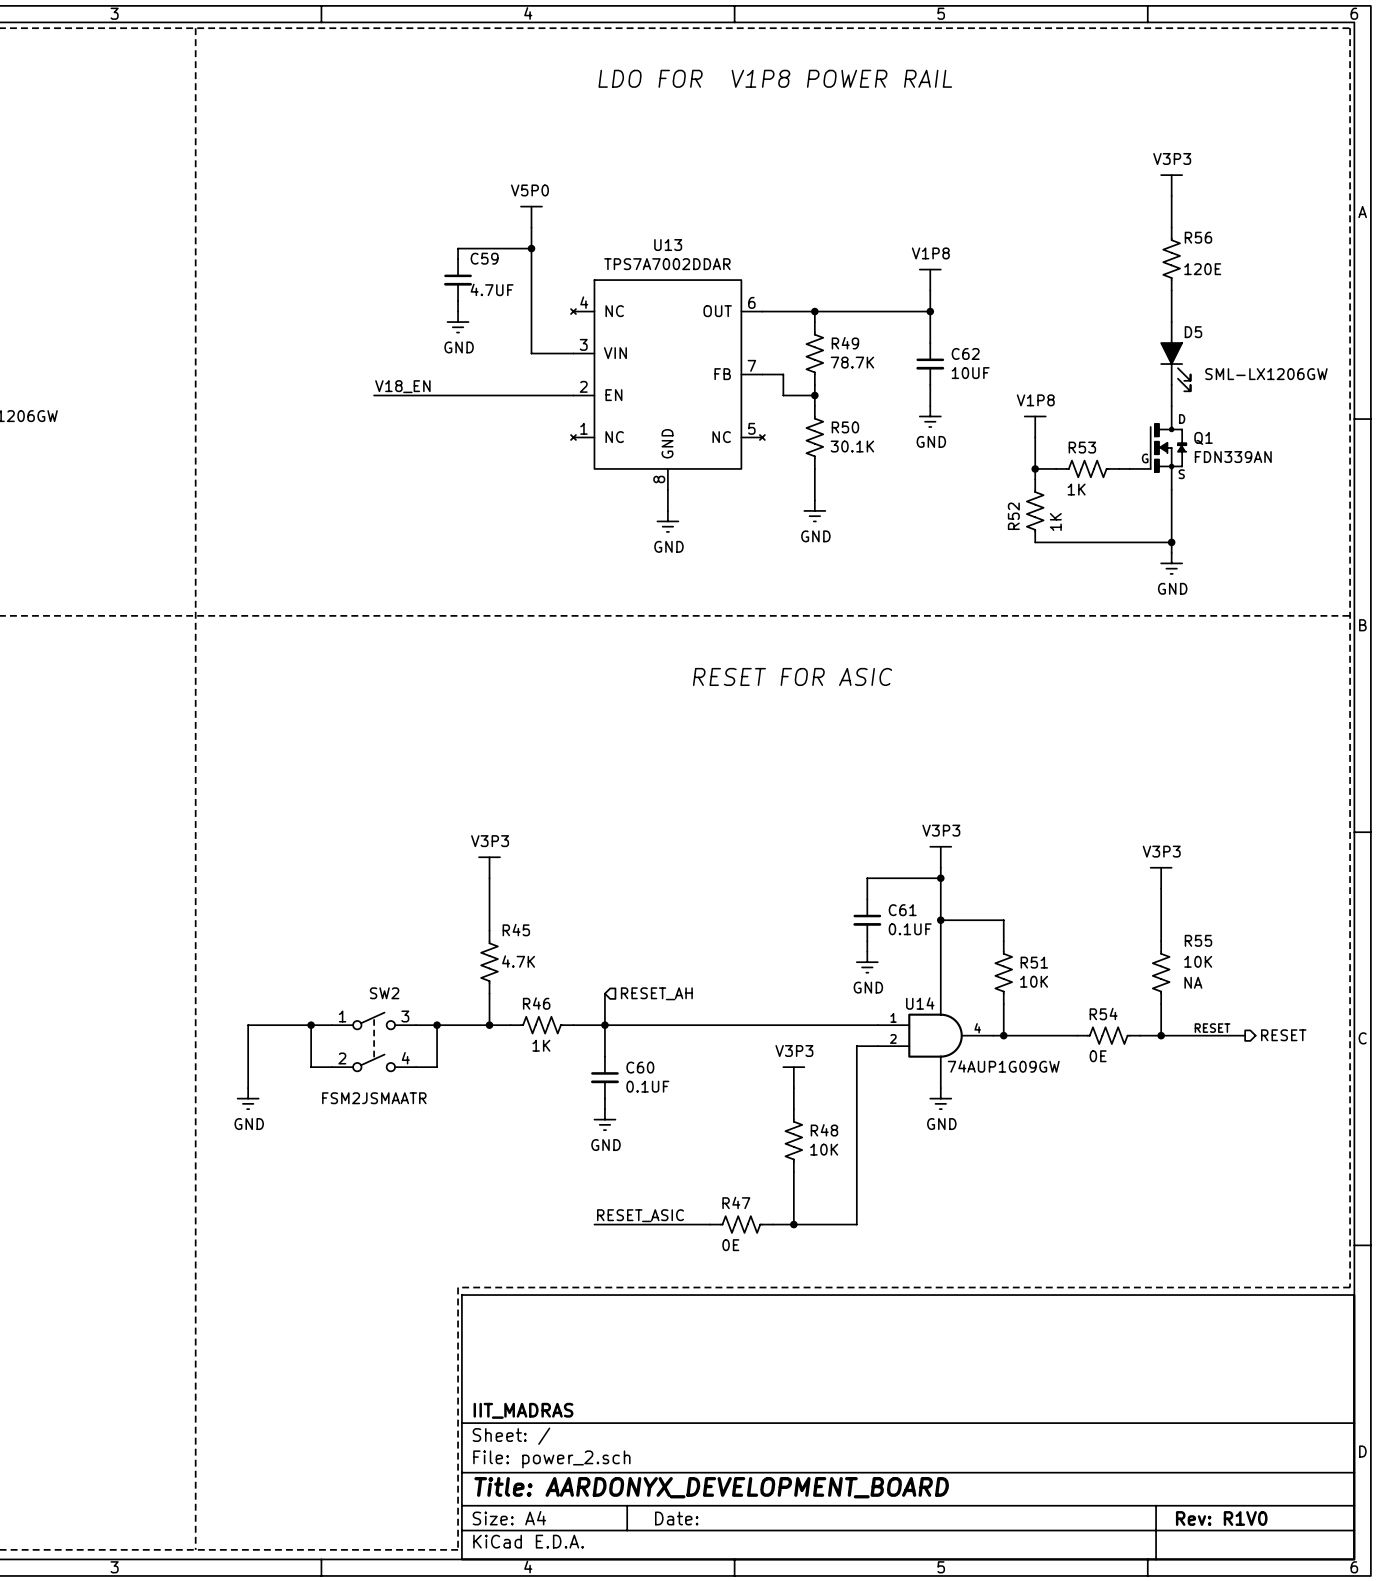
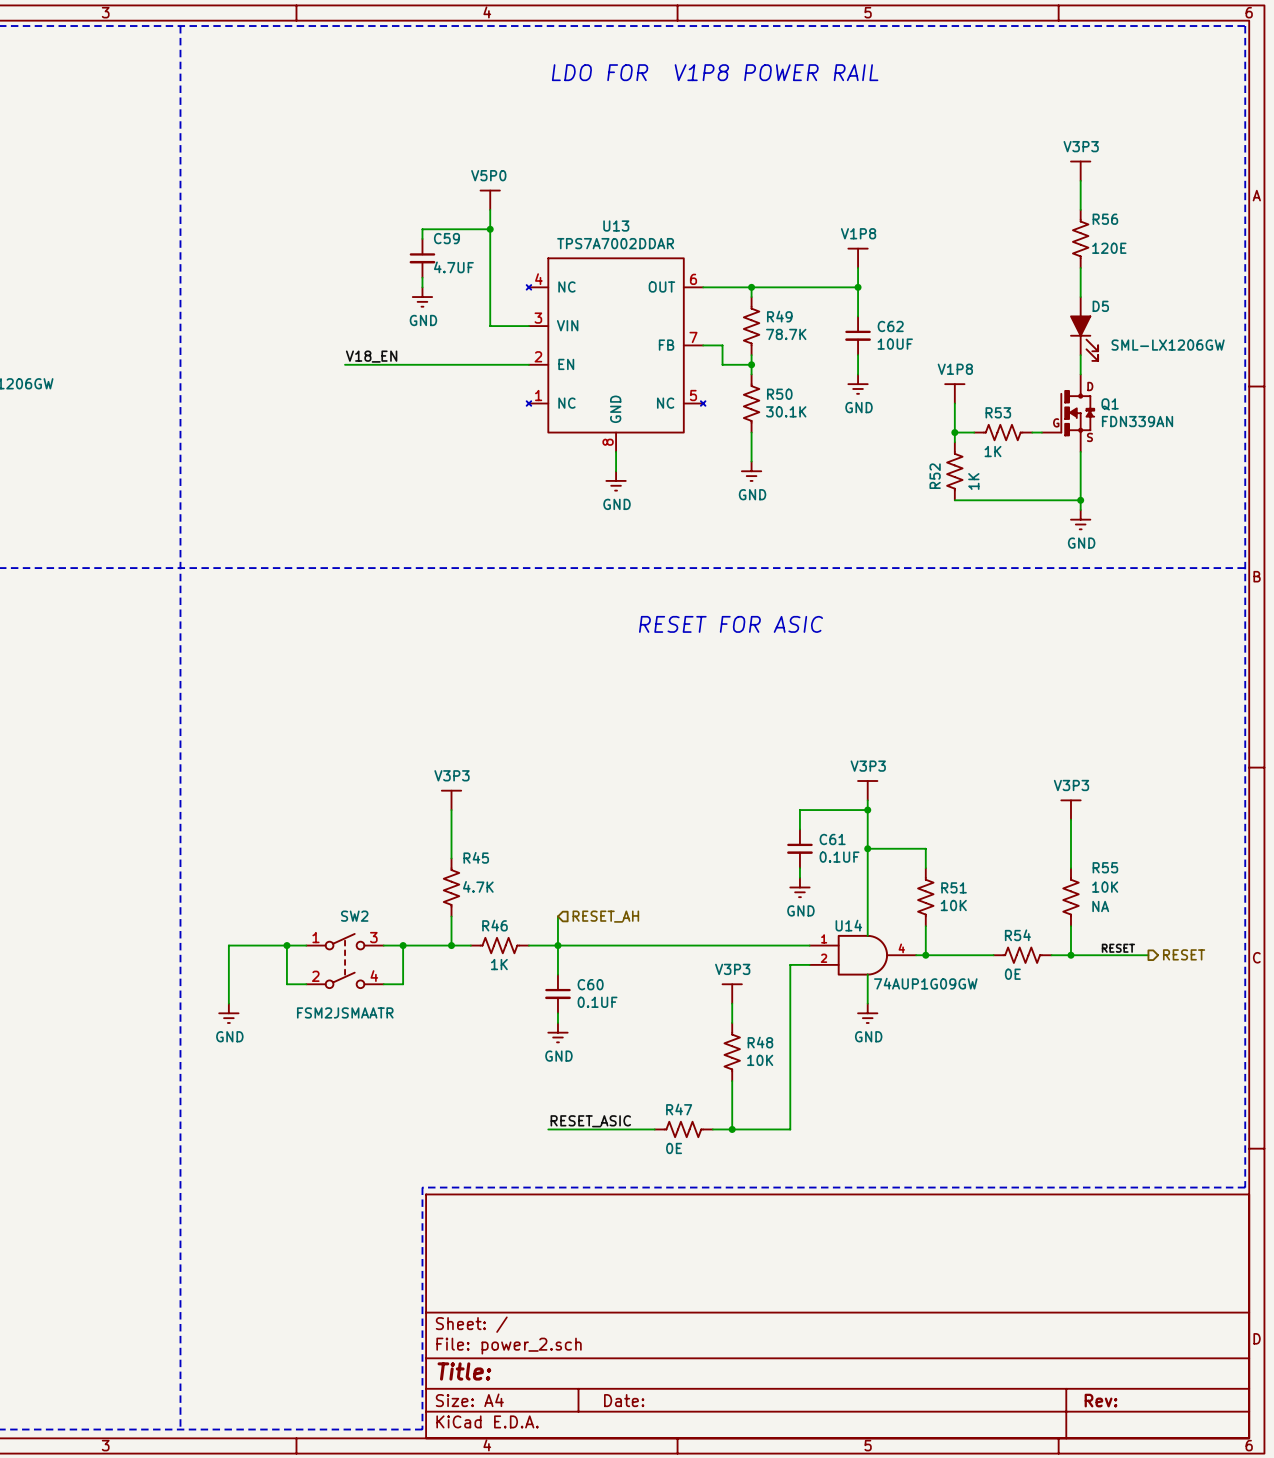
title block: IIT_MADRAS (523, 1410) -> none
title block: Title: AARDONYX_DEVELOPMENT_BOARD (711, 1487) -> Title: (464, 1371)
title block: Rev: R1V0 (1221, 1518) -> Rev: (1100, 1400)

